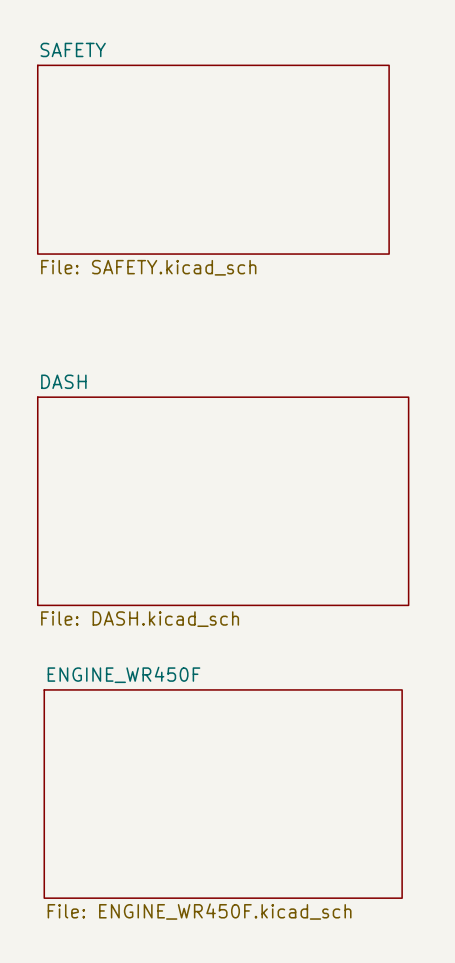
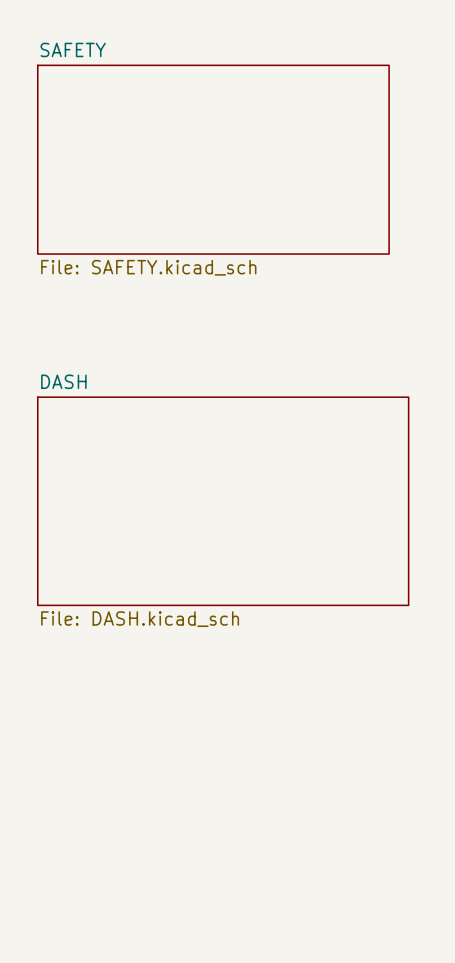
sheet ENGINE_WR450F: File: ENGINE_WR450F.kicad_sch (223, 794) -> none

